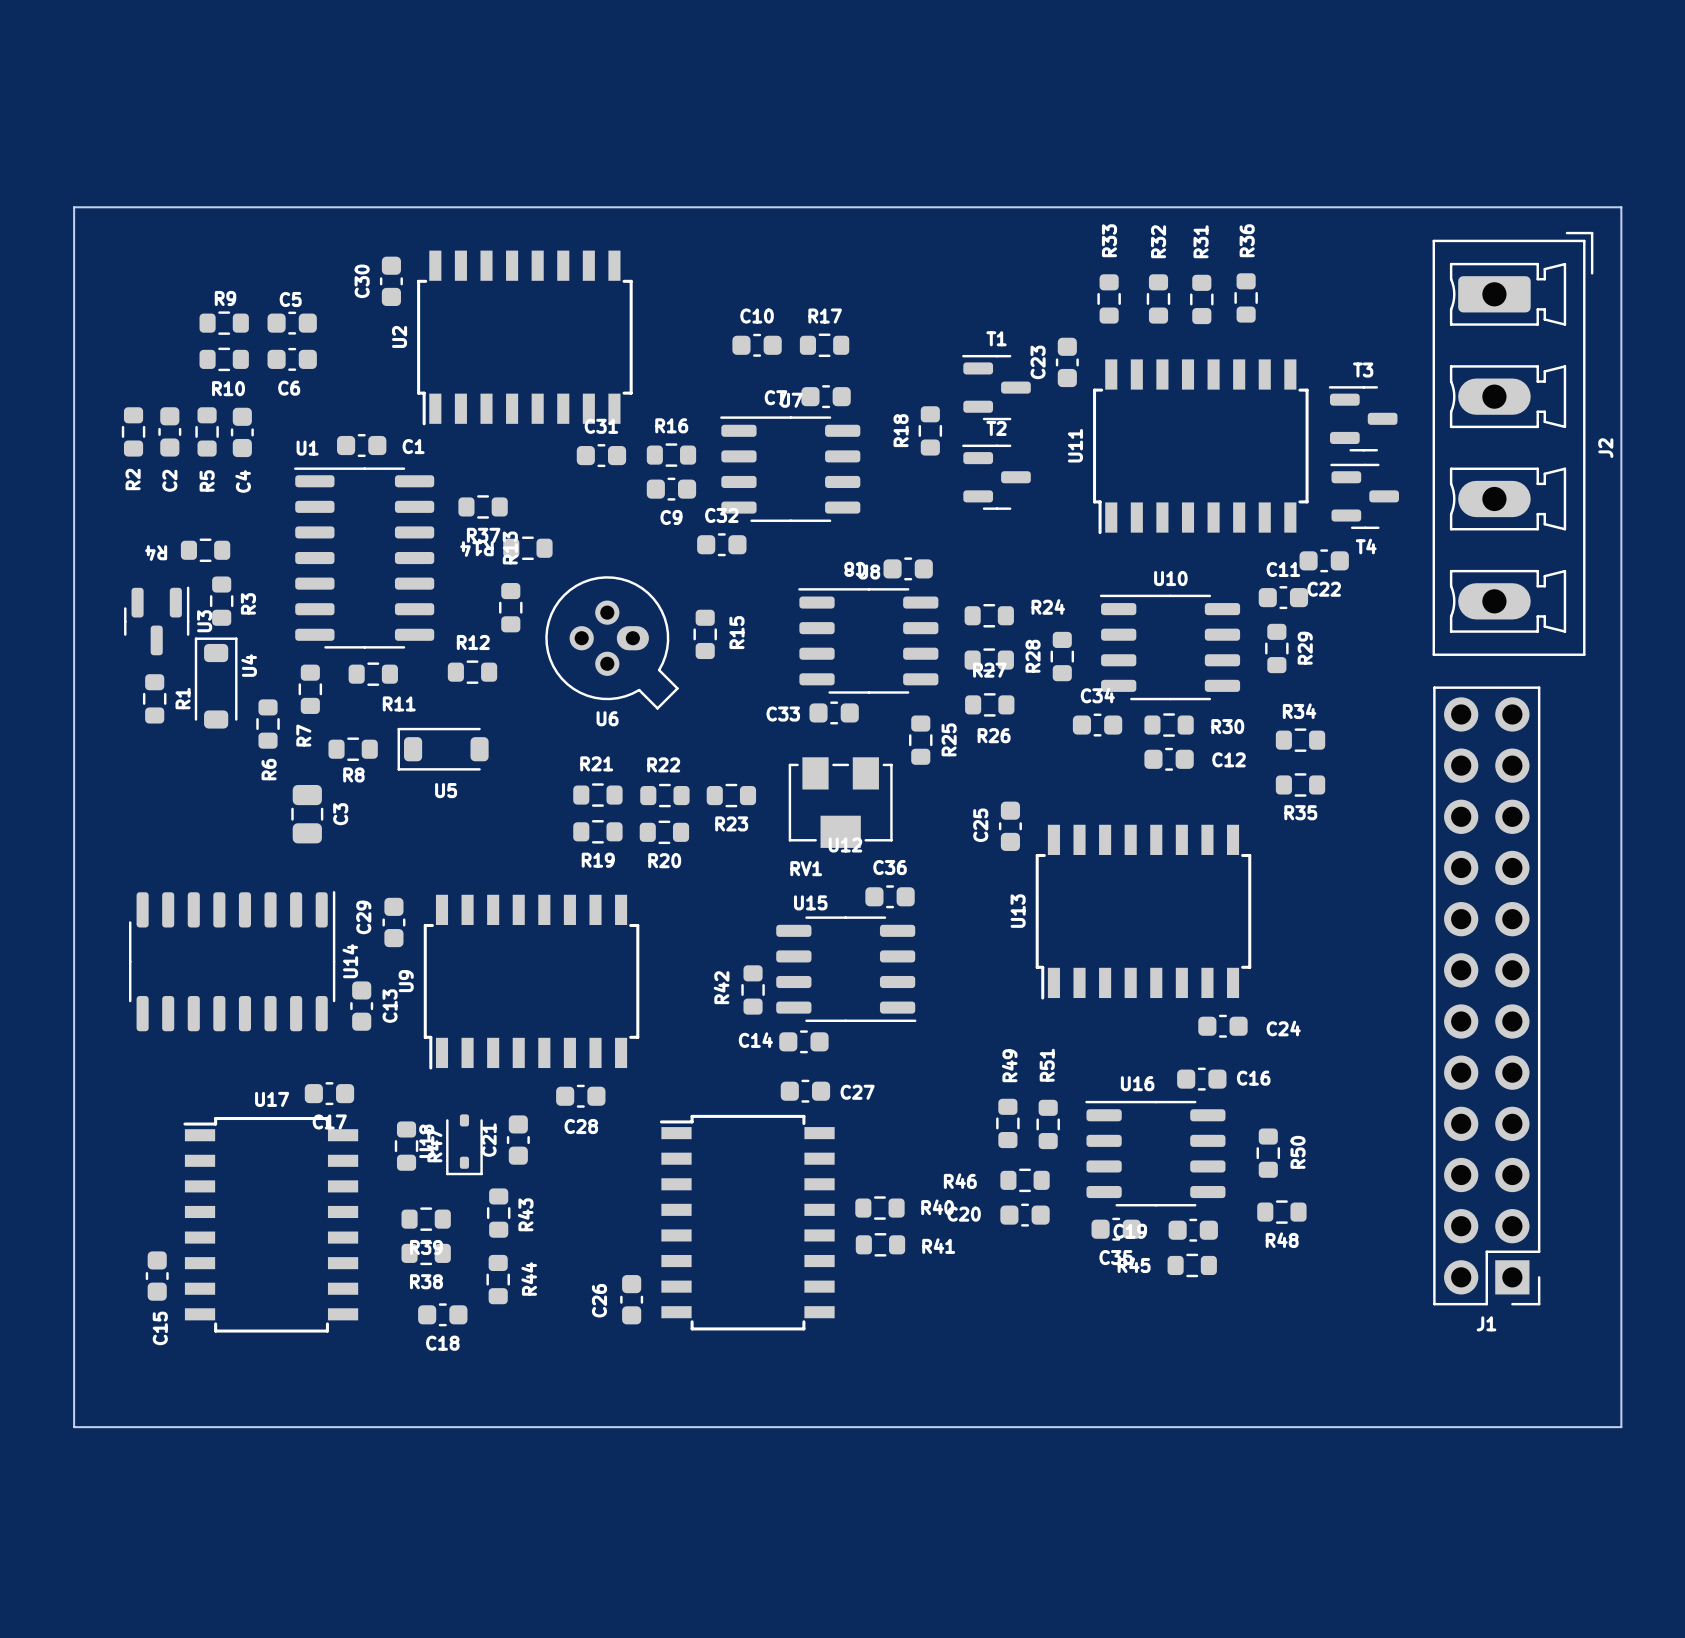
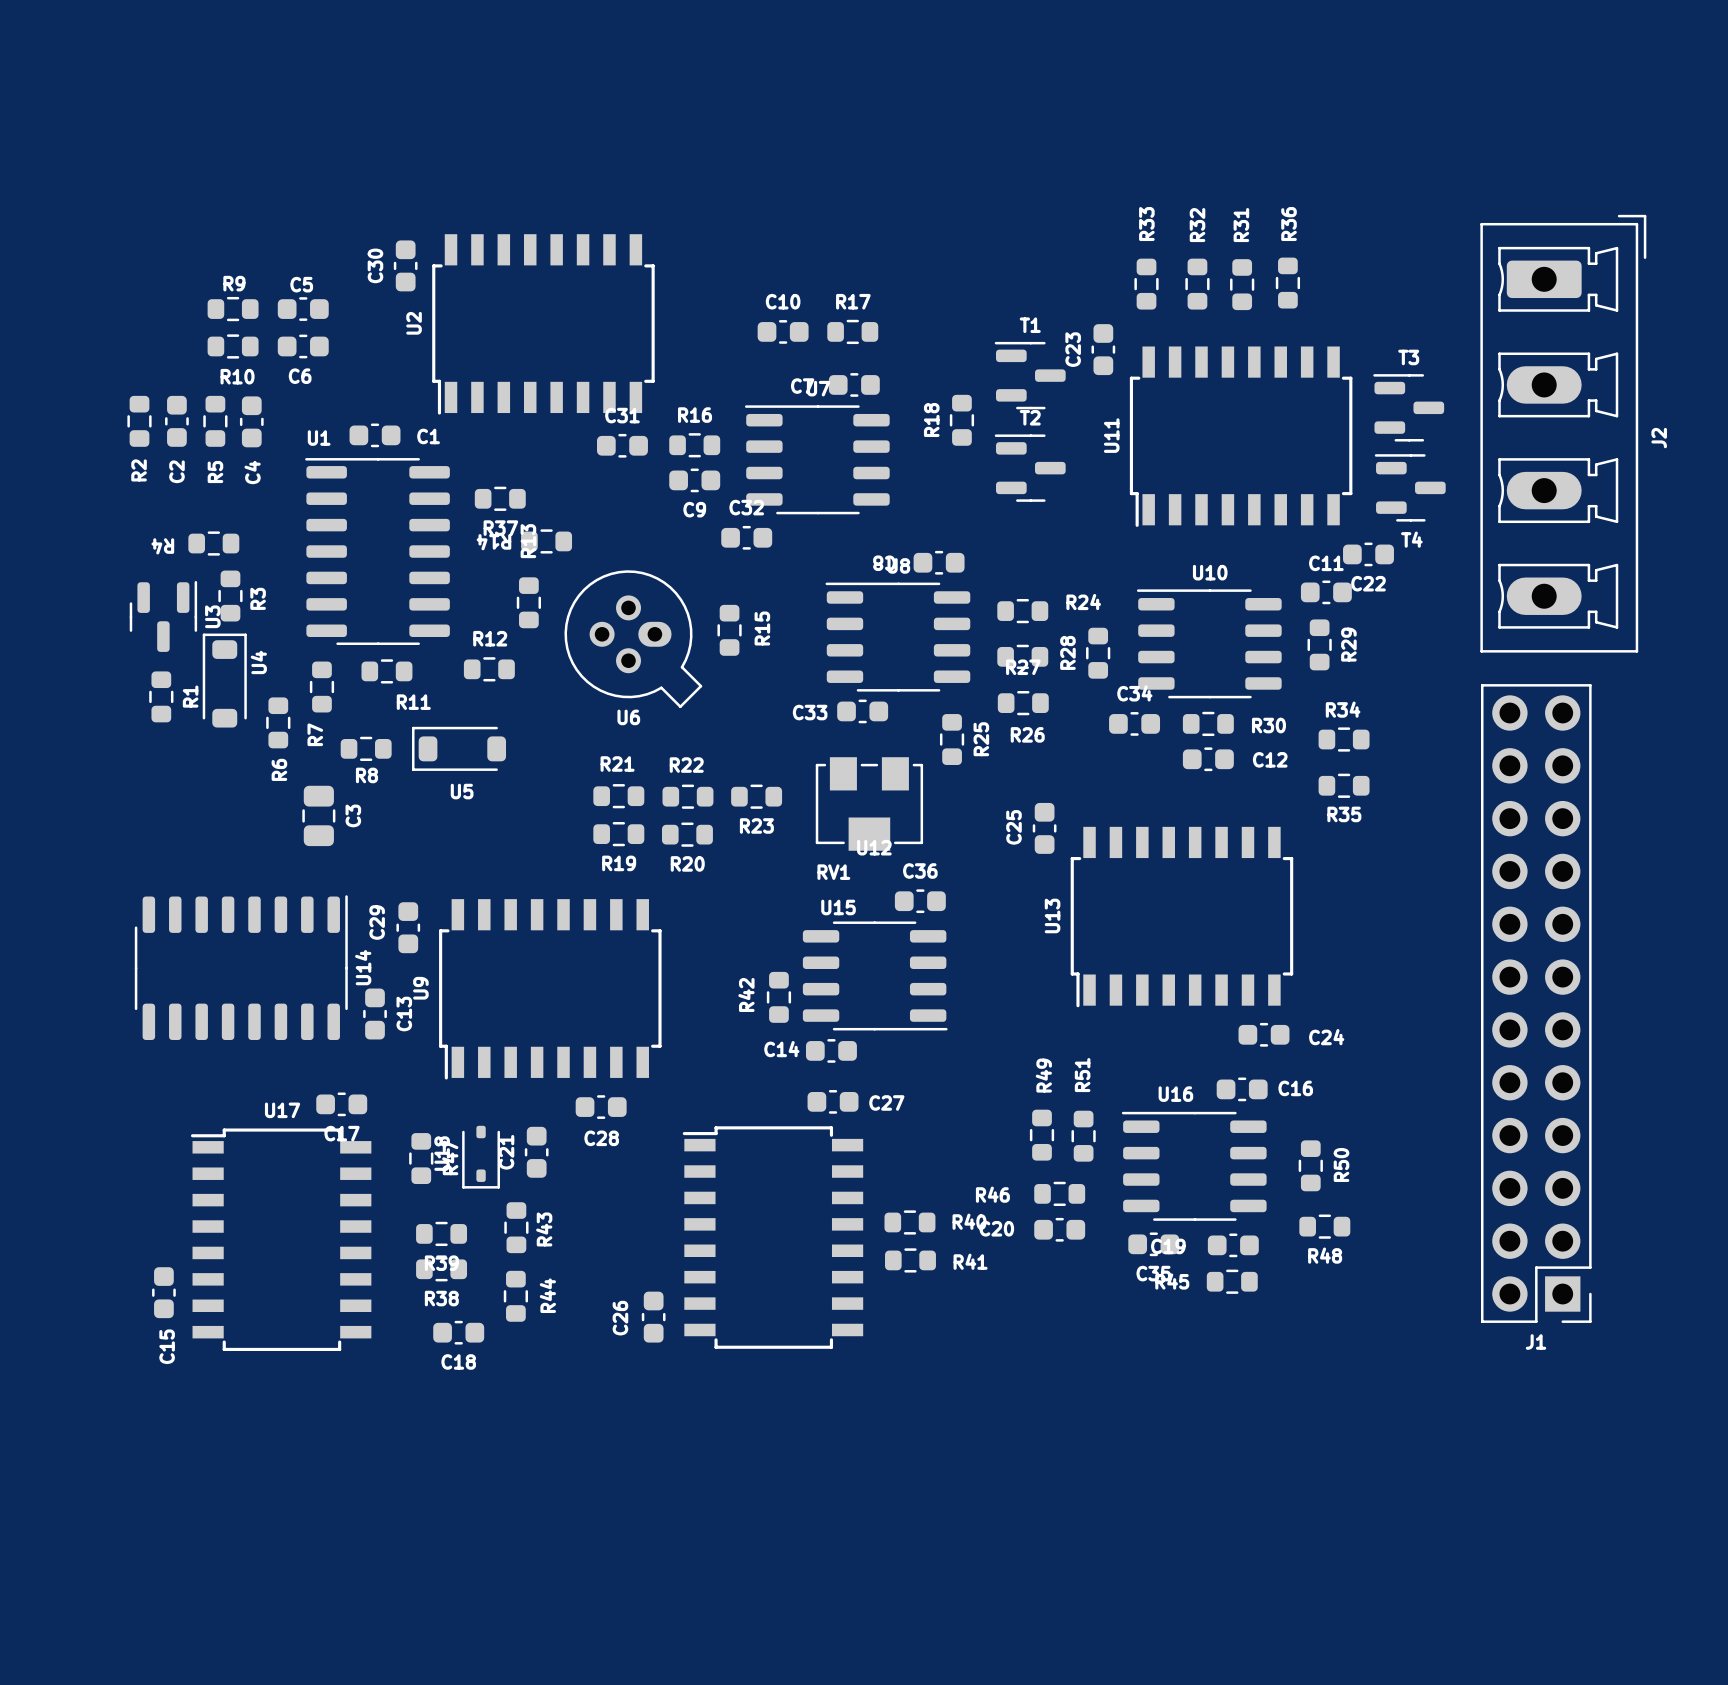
board edge: (74, 207) (1621, 207) (1621, 1427) (74, 1427) (74, 207) -> none

